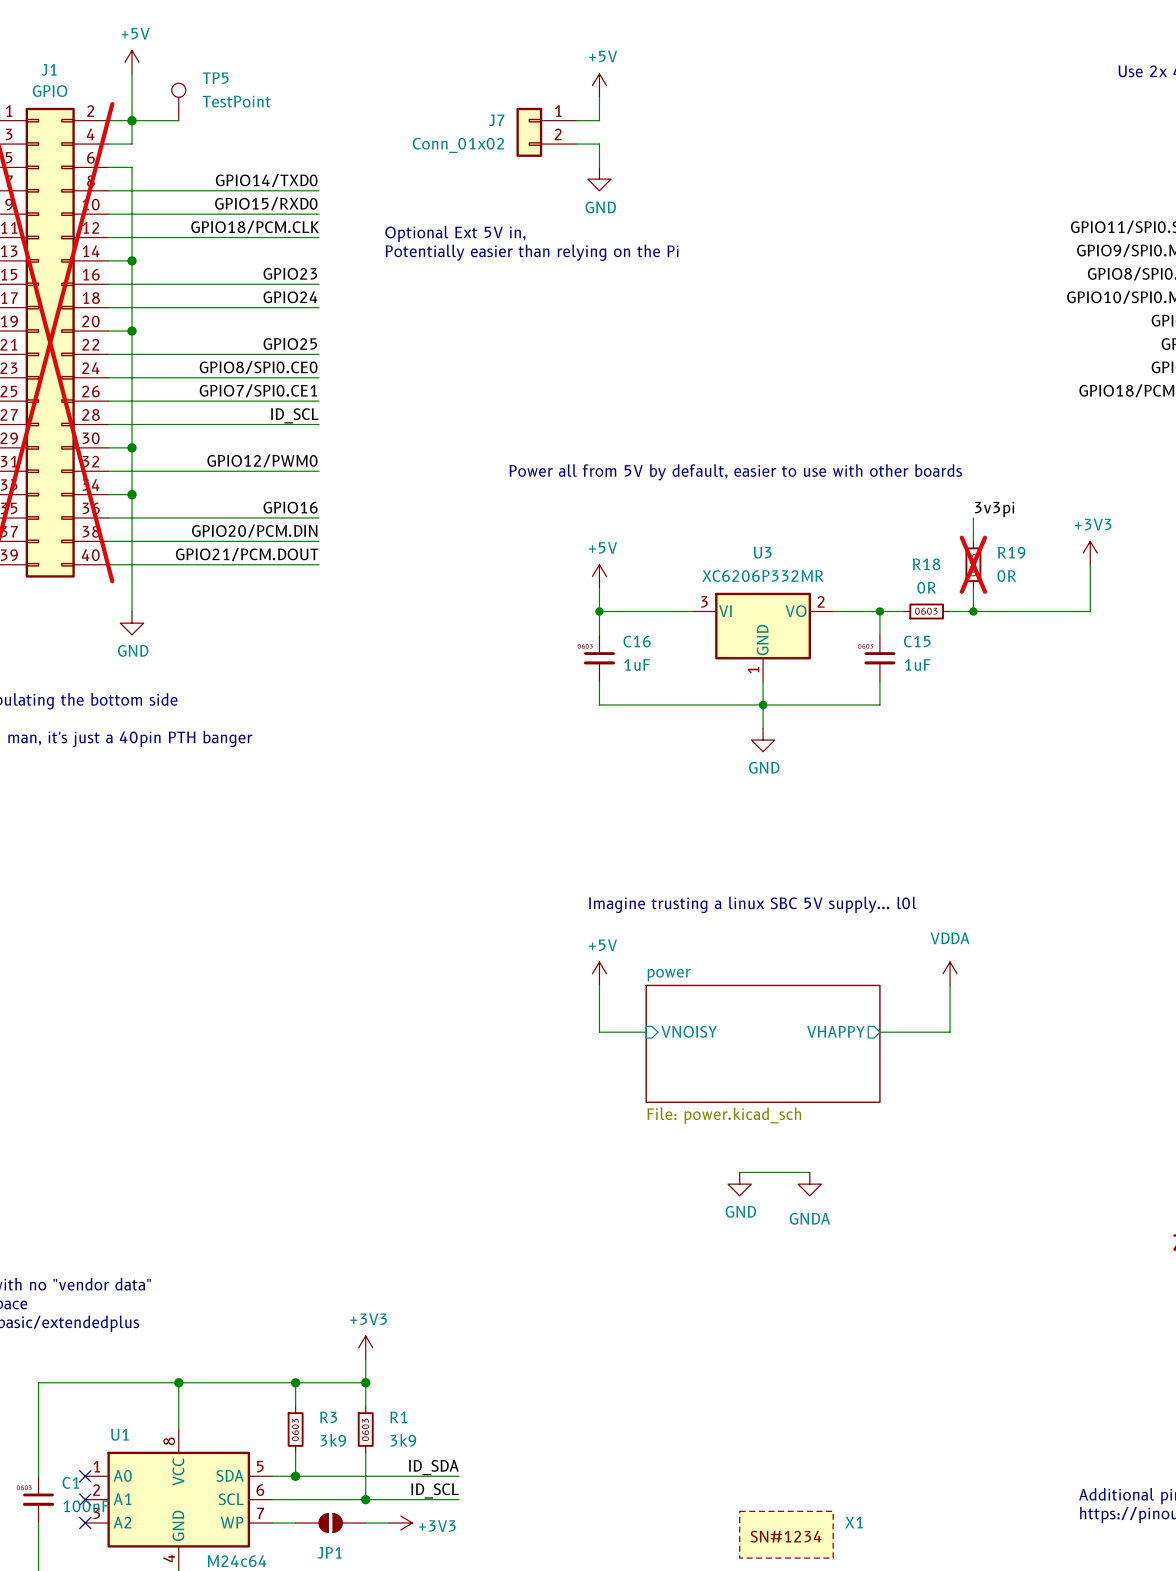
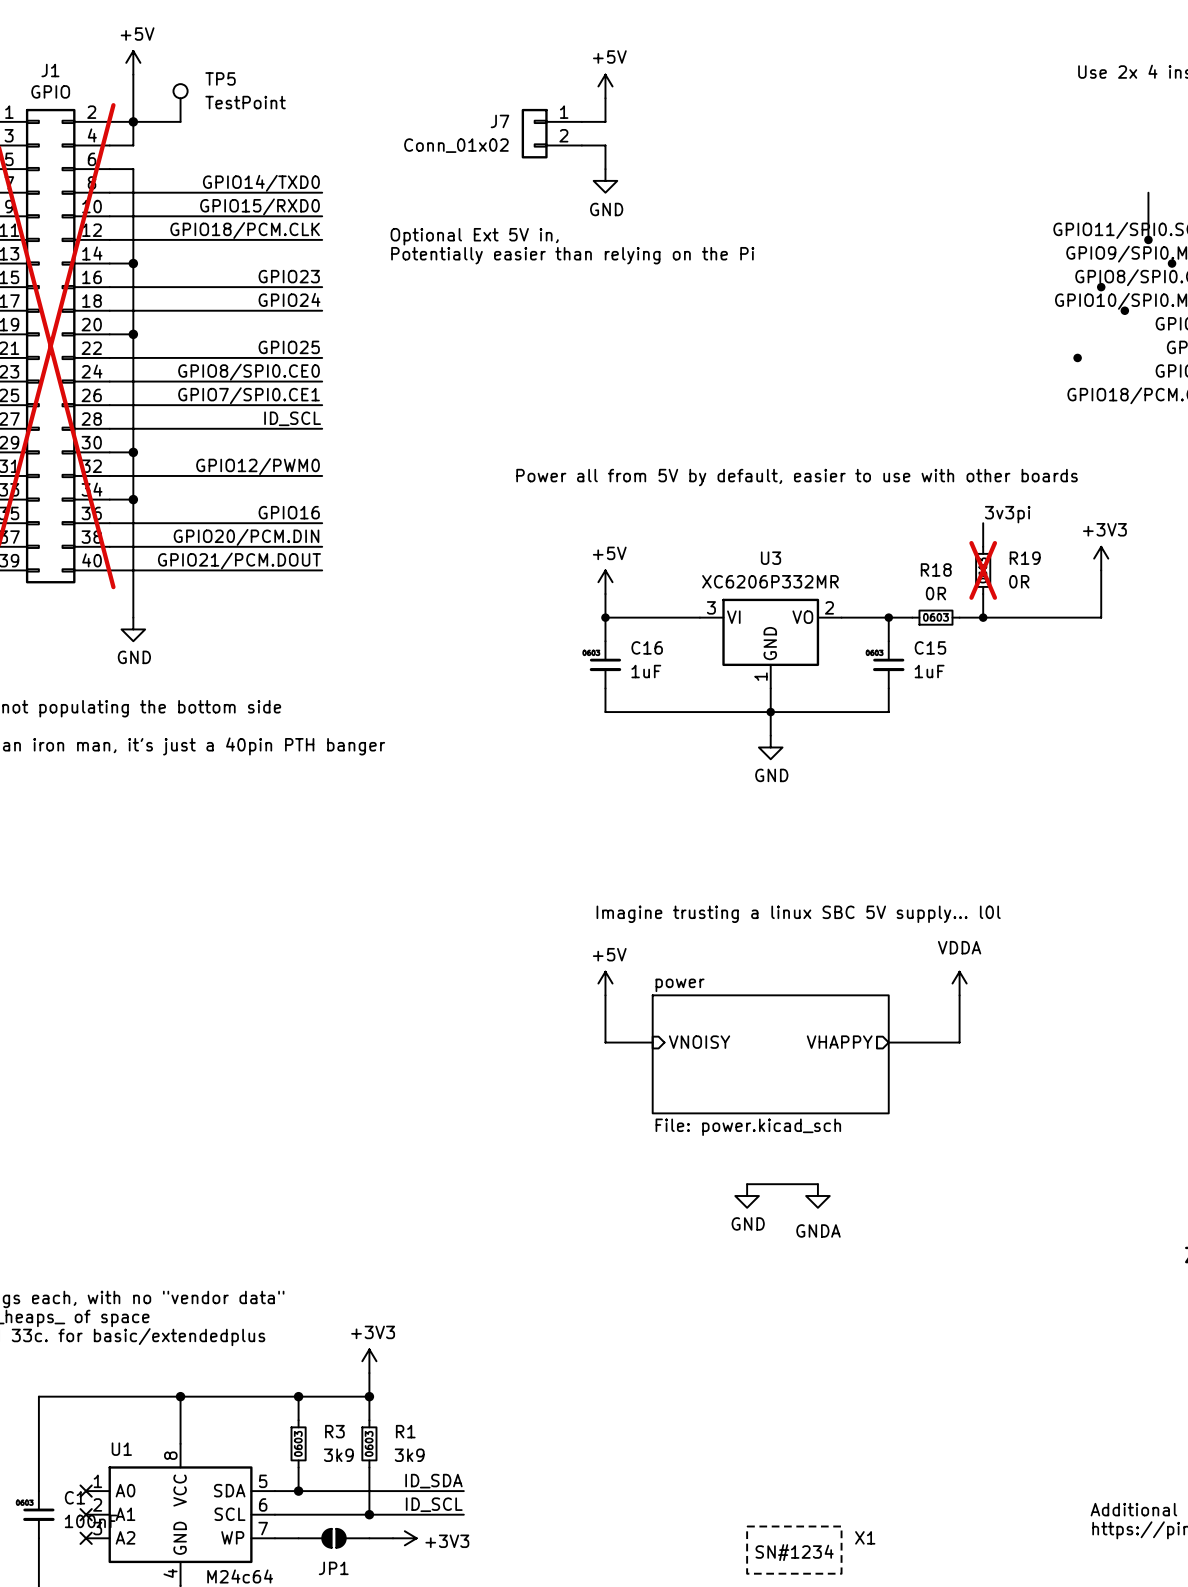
wire: none -> (1148, 192) (1148, 239)
junction: none -> (1148, 239)
junction: none -> (1172, 263)
junction: none -> (1101, 287)
junction: none -> (1124, 310)
junction: none -> (1077, 357)

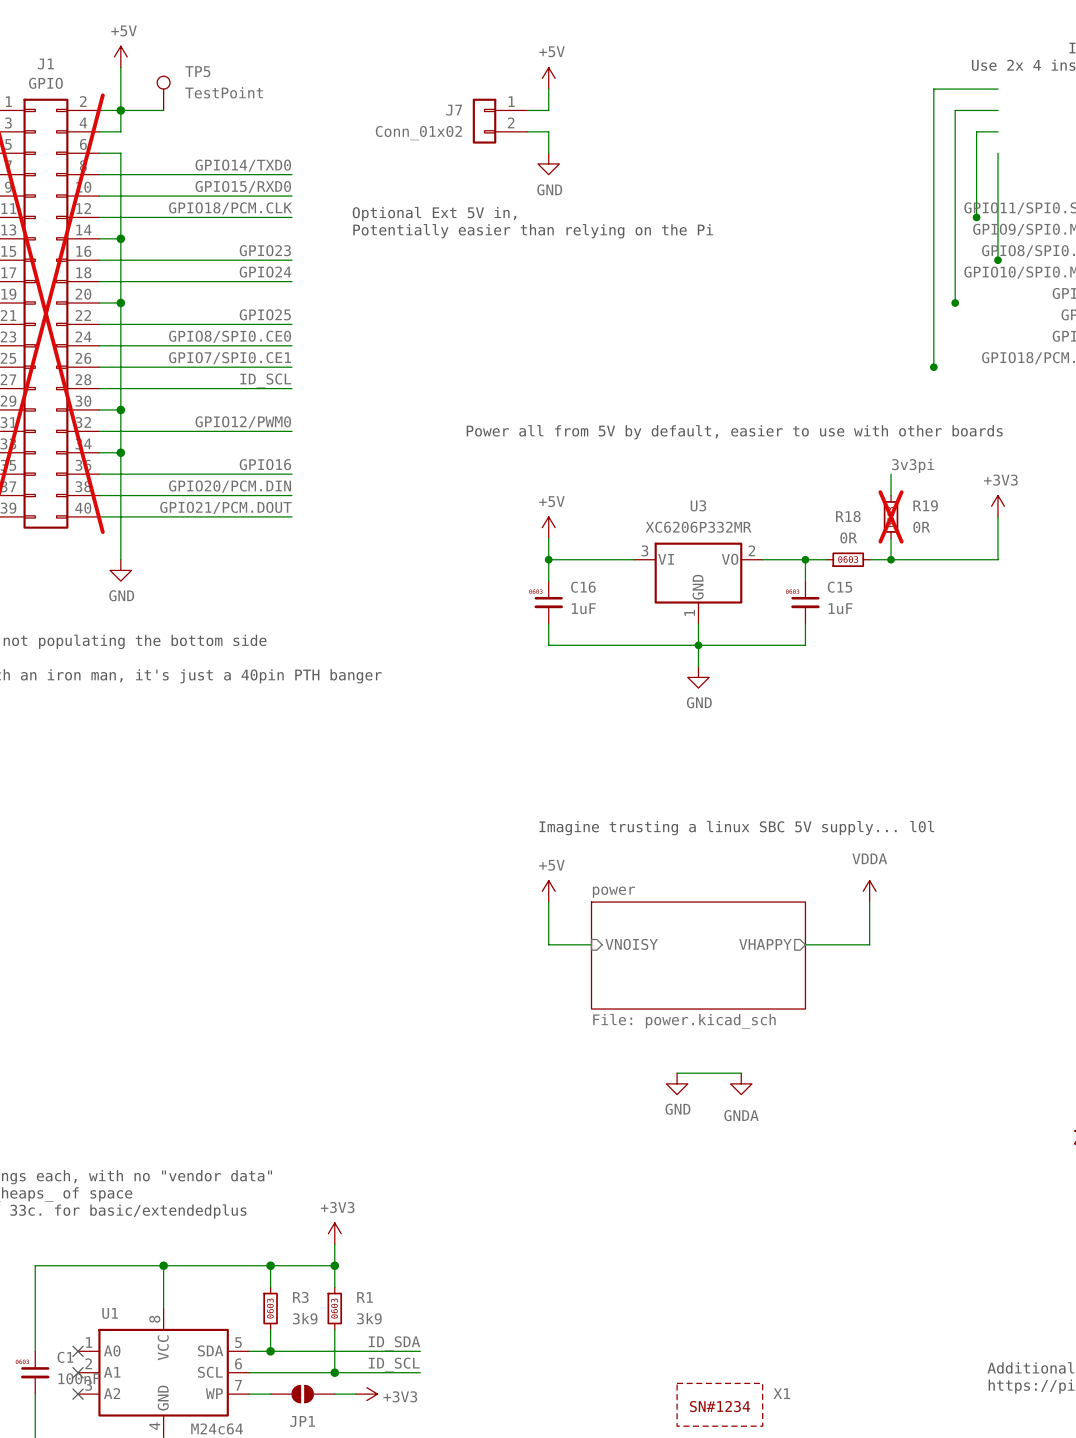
wire: none -> (998, 89) (933, 89) (933, 367)
wire: none -> (998, 110) (955, 110) (955, 303)
wire: none -> (998, 131) (976, 131) (976, 217)
wire: none -> (998, 153) (998, 260)
wire: (1148, 192) (1148, 239) -> none
junction: none -> (976, 217)
junction: (1148, 239) -> none
junction: (1172, 263) -> none
junction: (1124, 310) -> none
junction: none -> (955, 303)
junction: (1077, 357) -> none
junction: none -> (933, 367)

